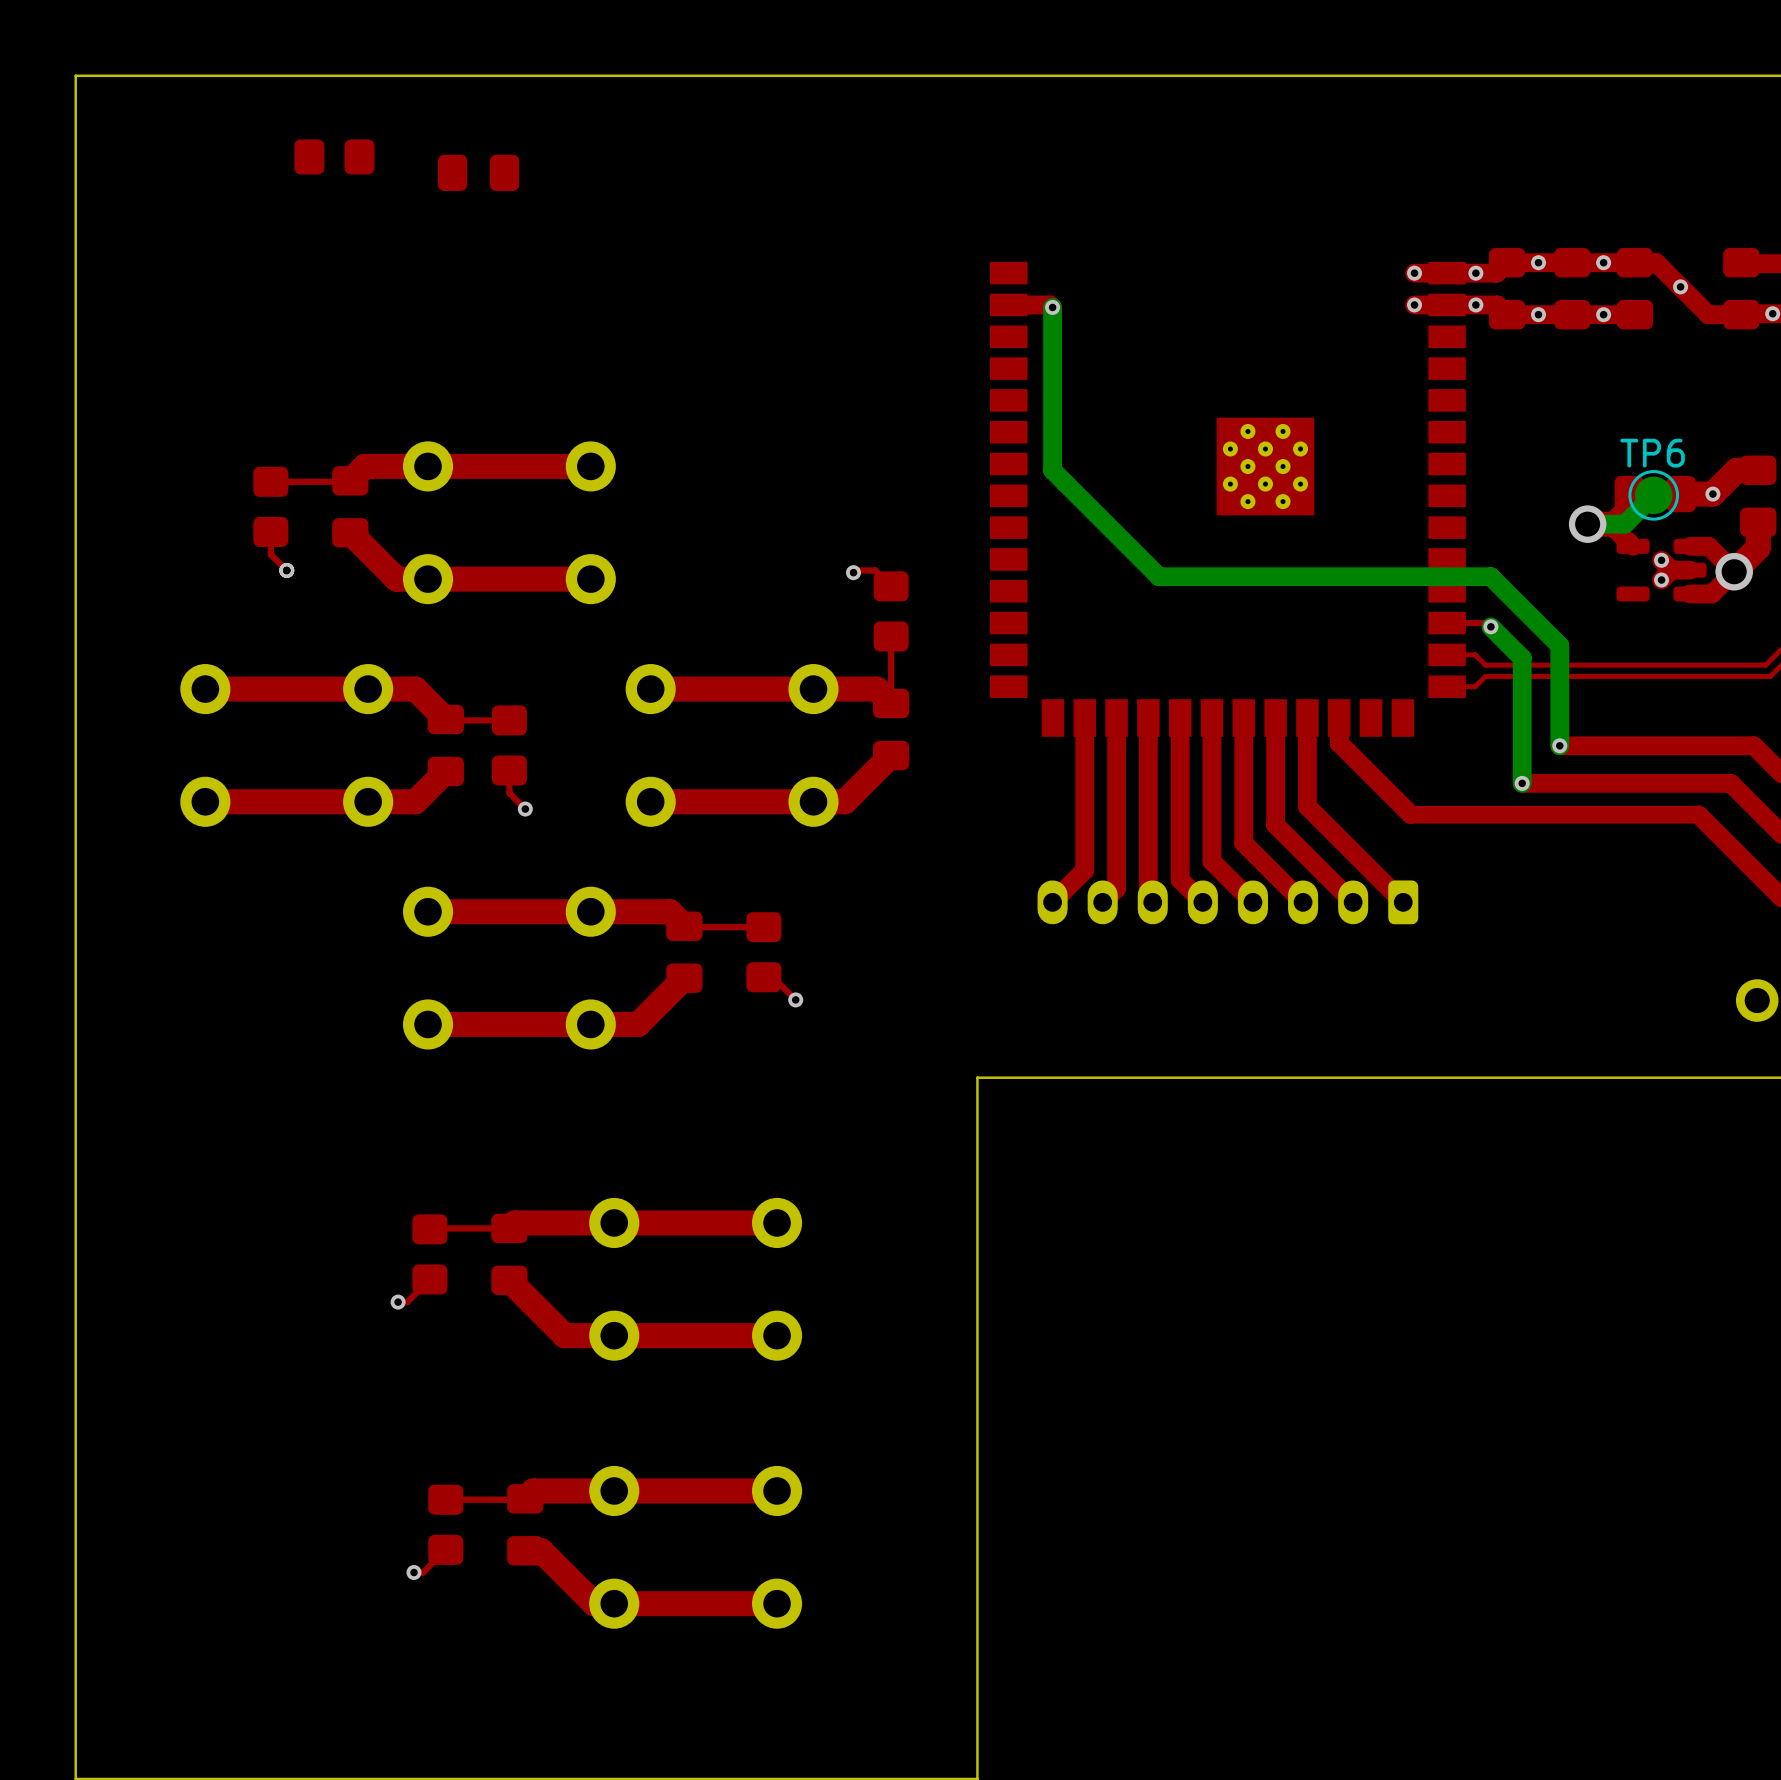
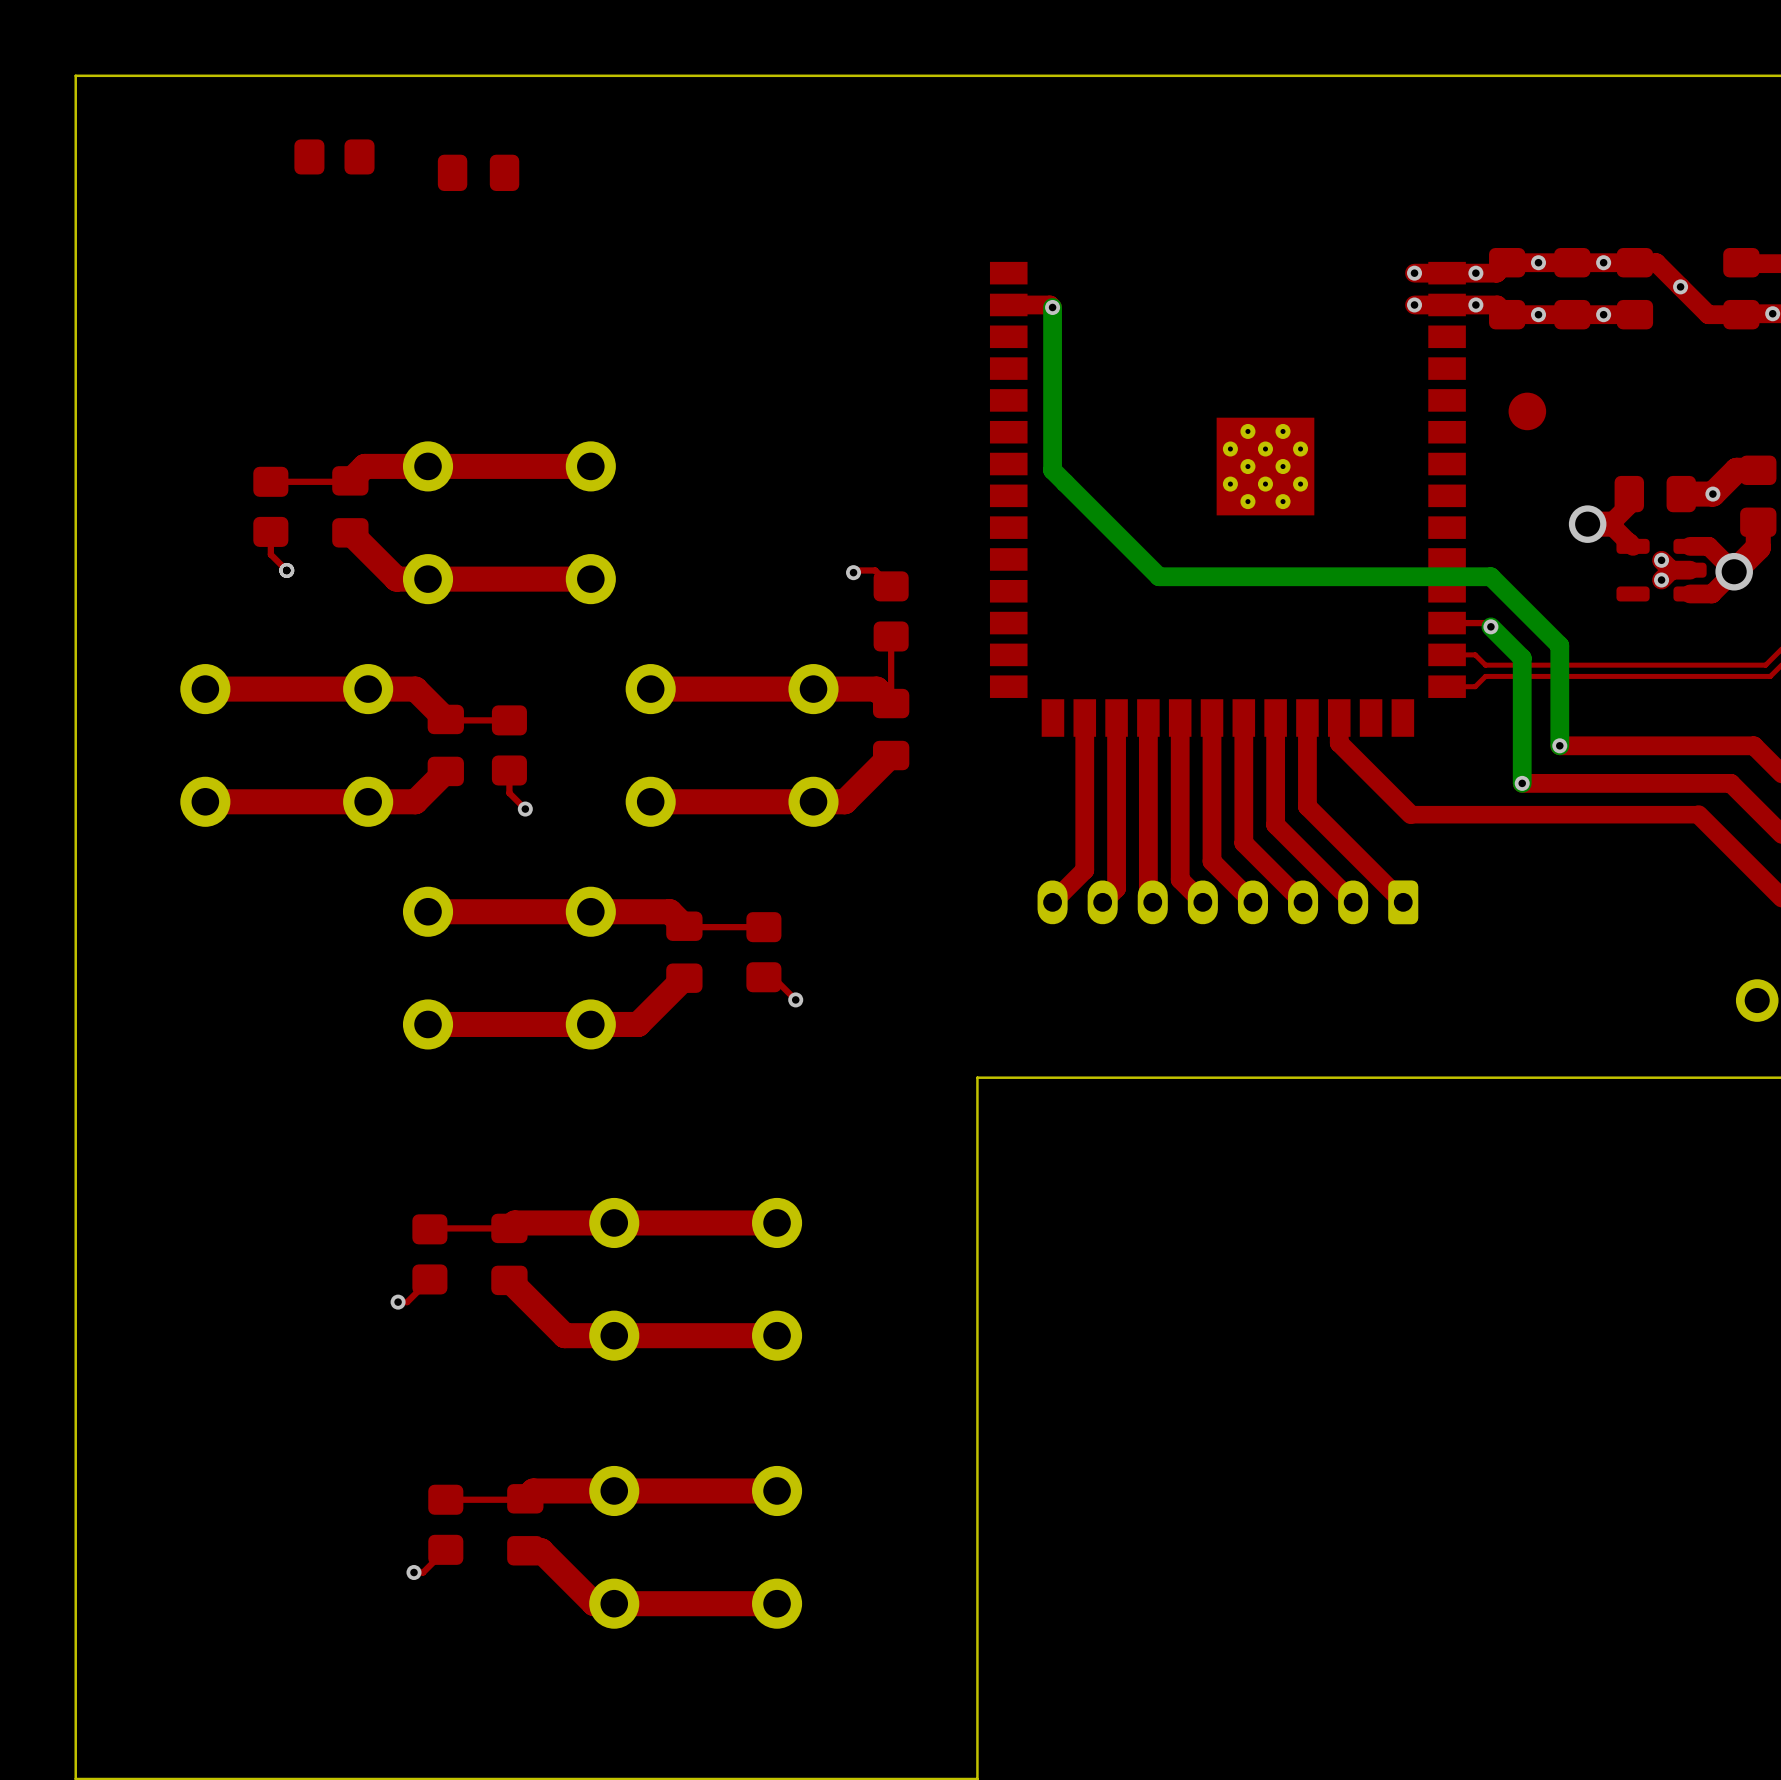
bottom track: (1653, 495) (1624, 524) (1587, 524) -> none
TP6 side: bottom (1653, 495) -> top (1527, 411)

